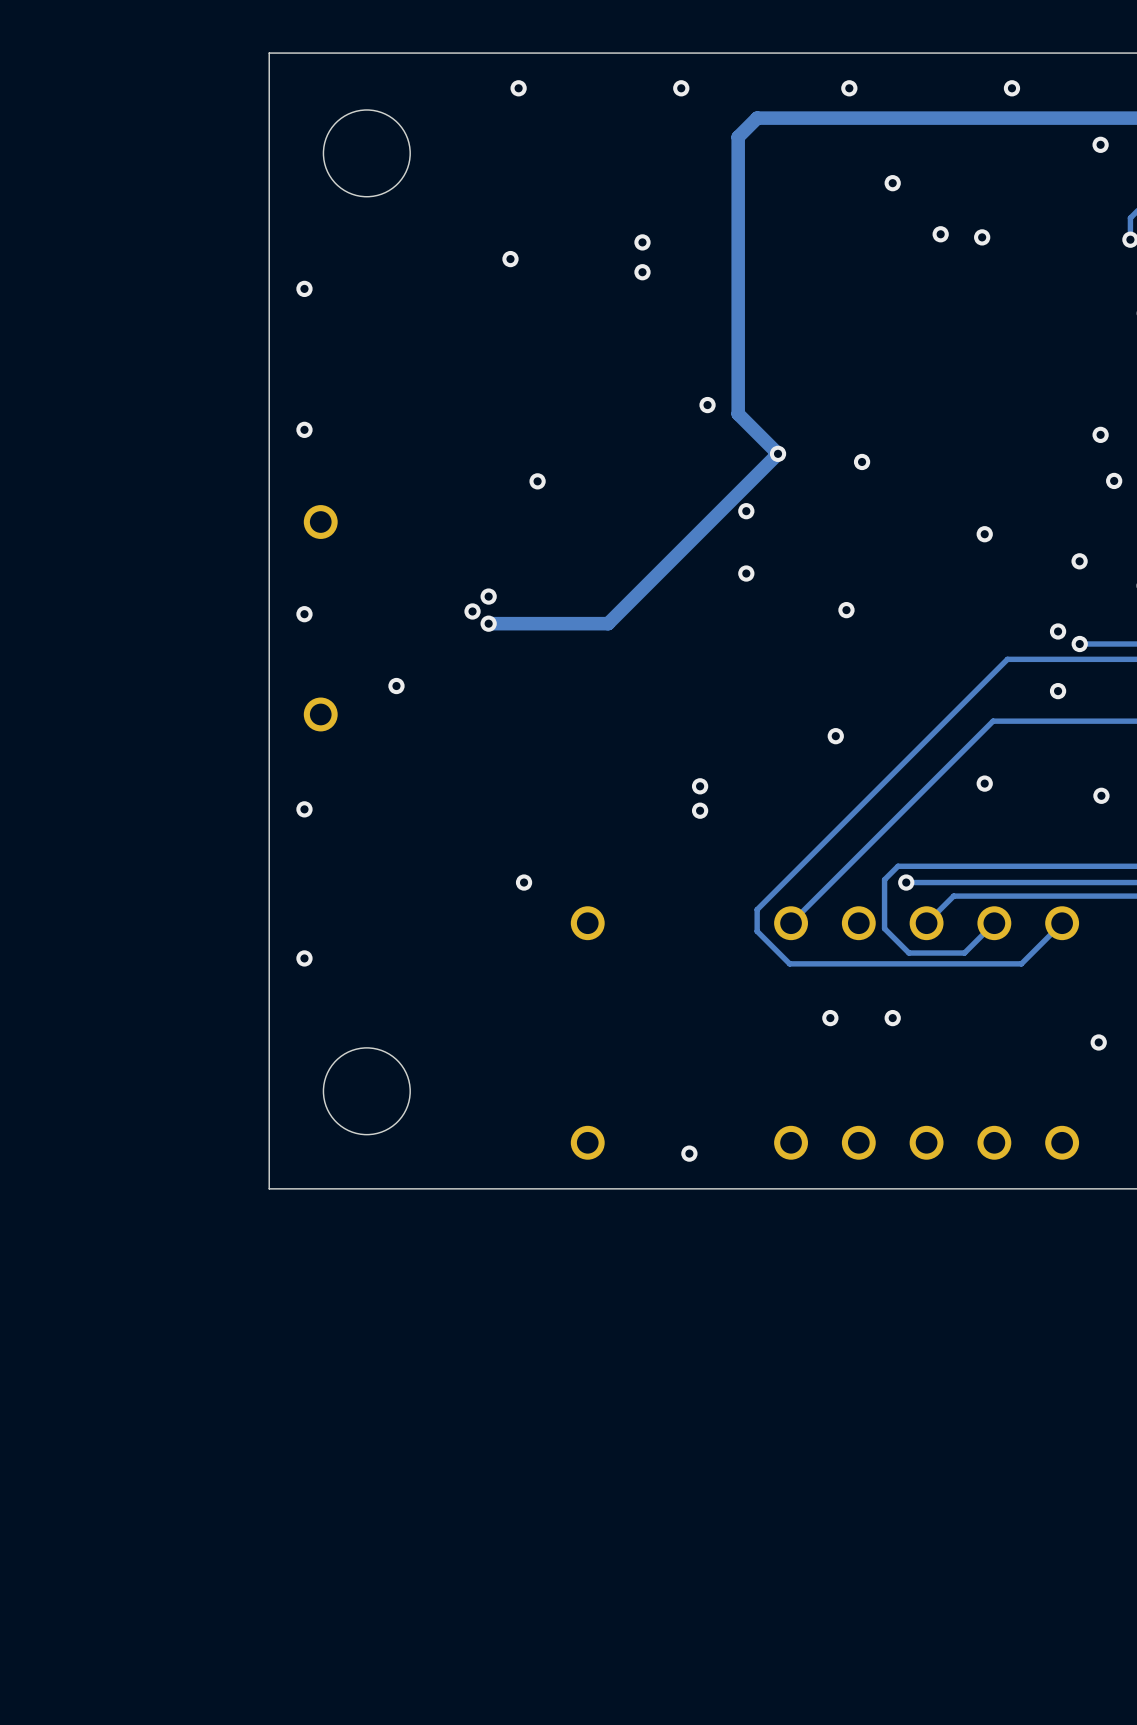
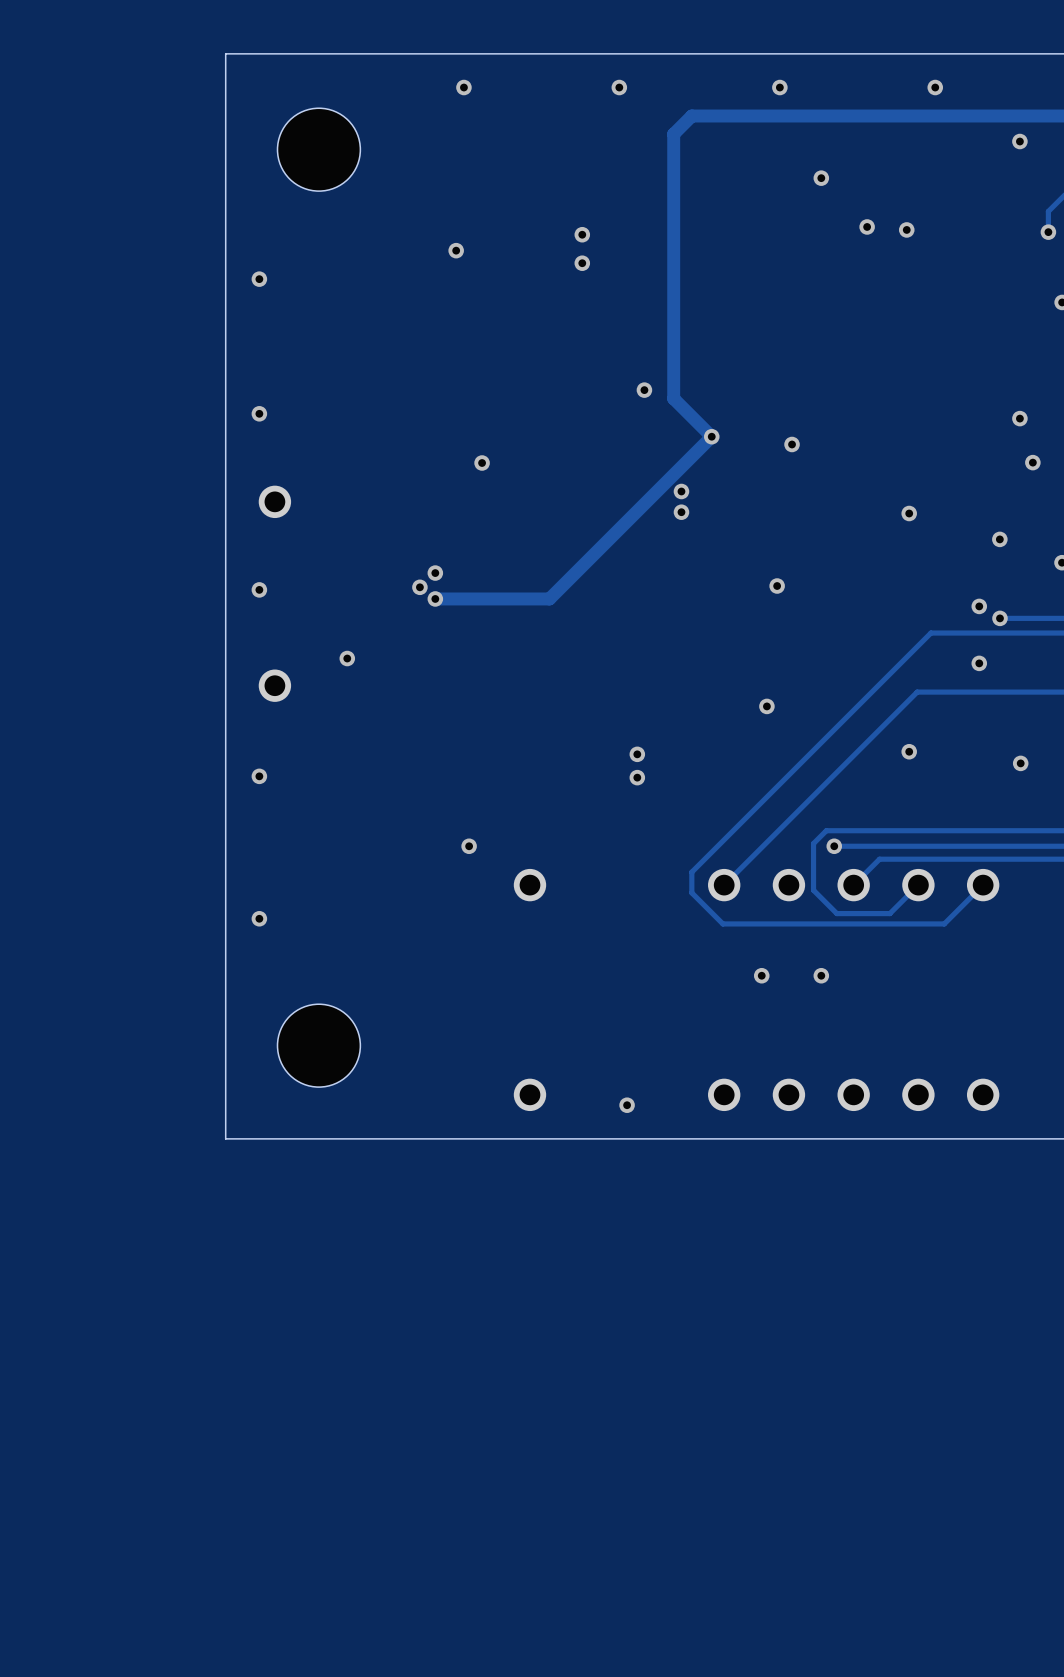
via position: (746, 573) -> (681, 512)
via: (1098, 1042) -> none

